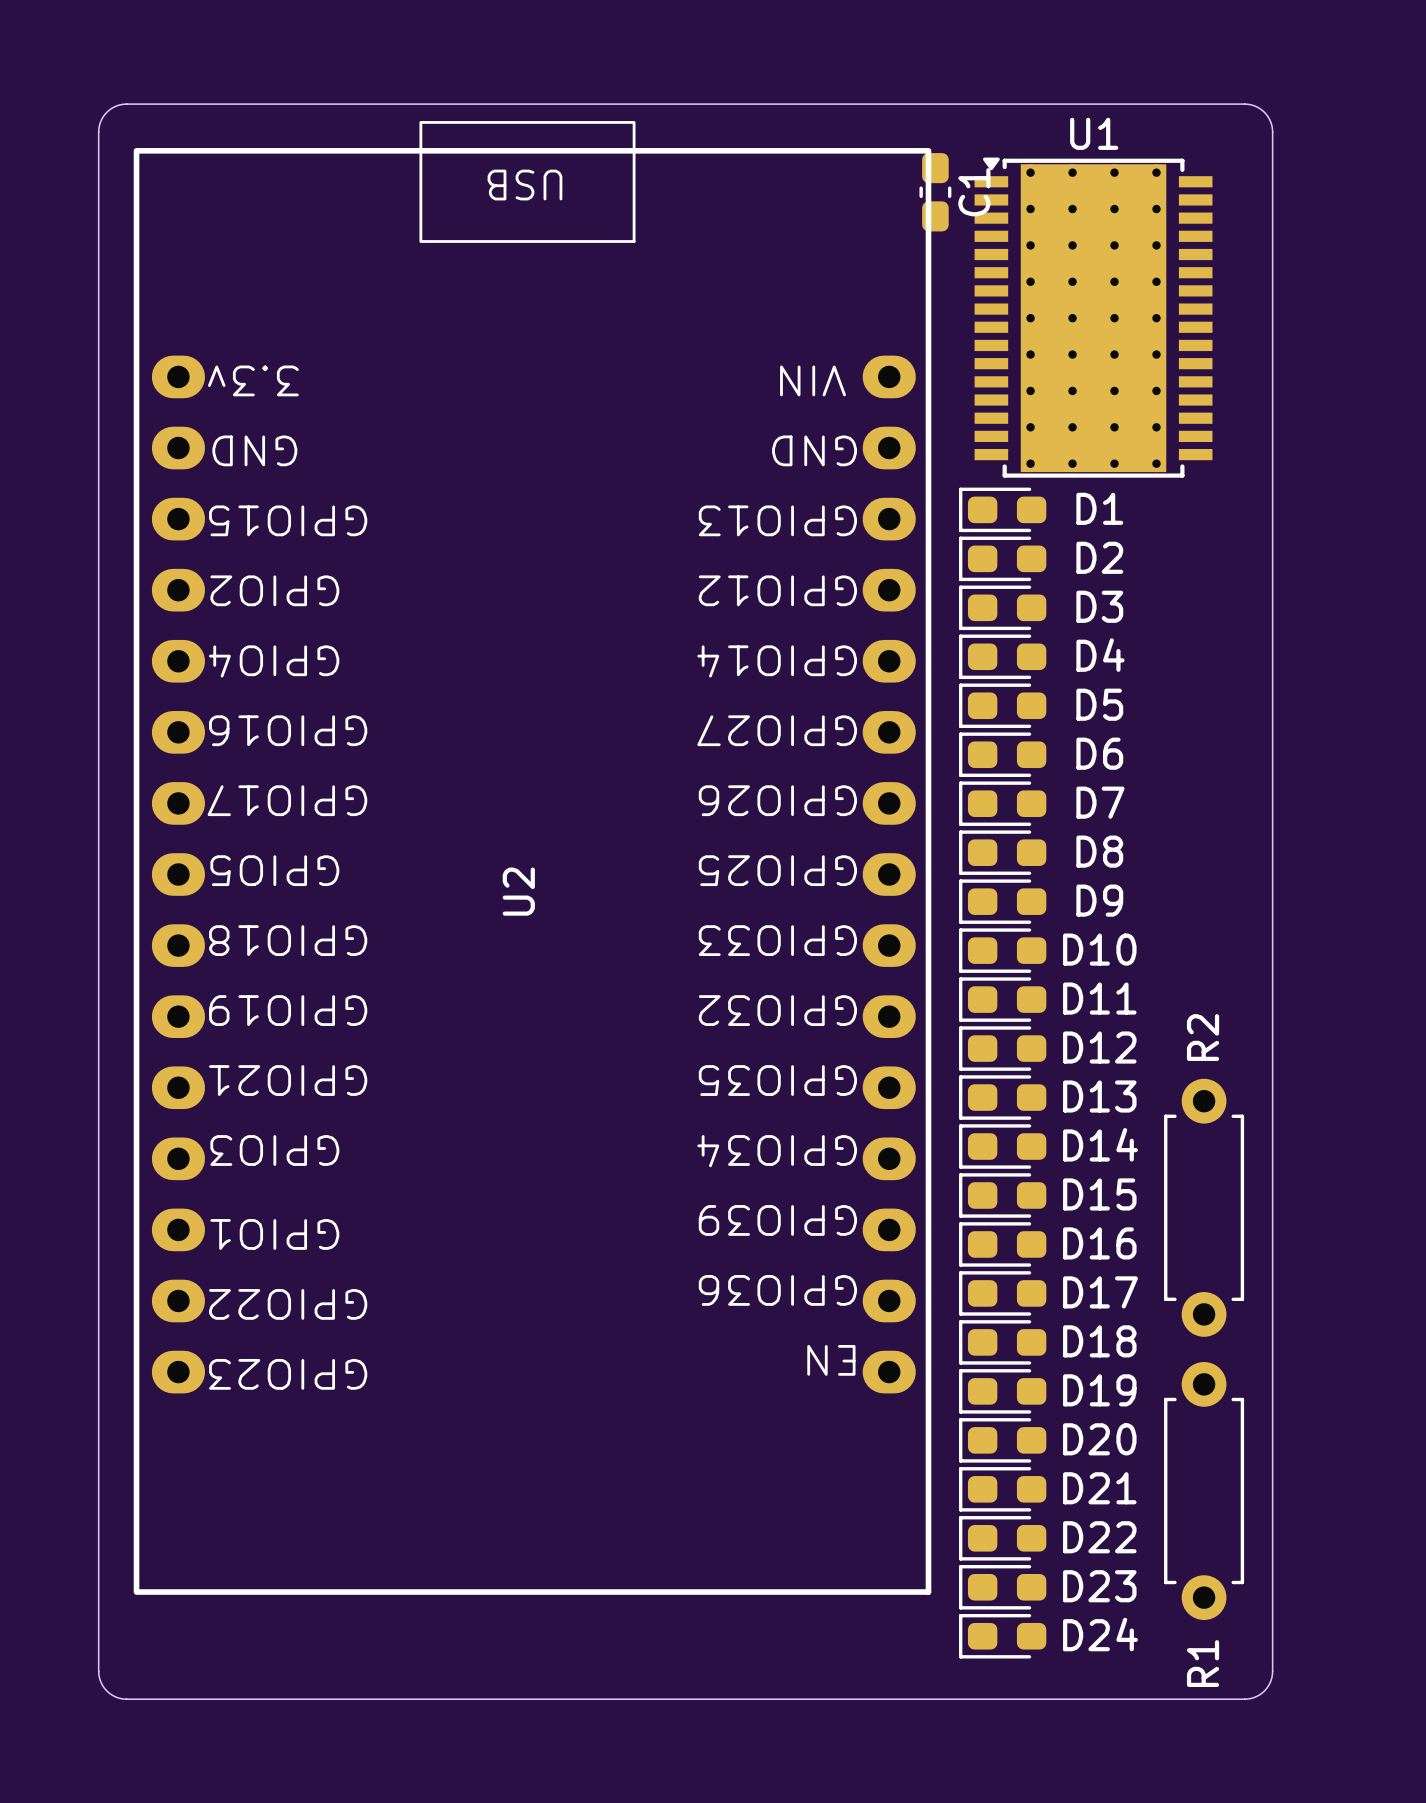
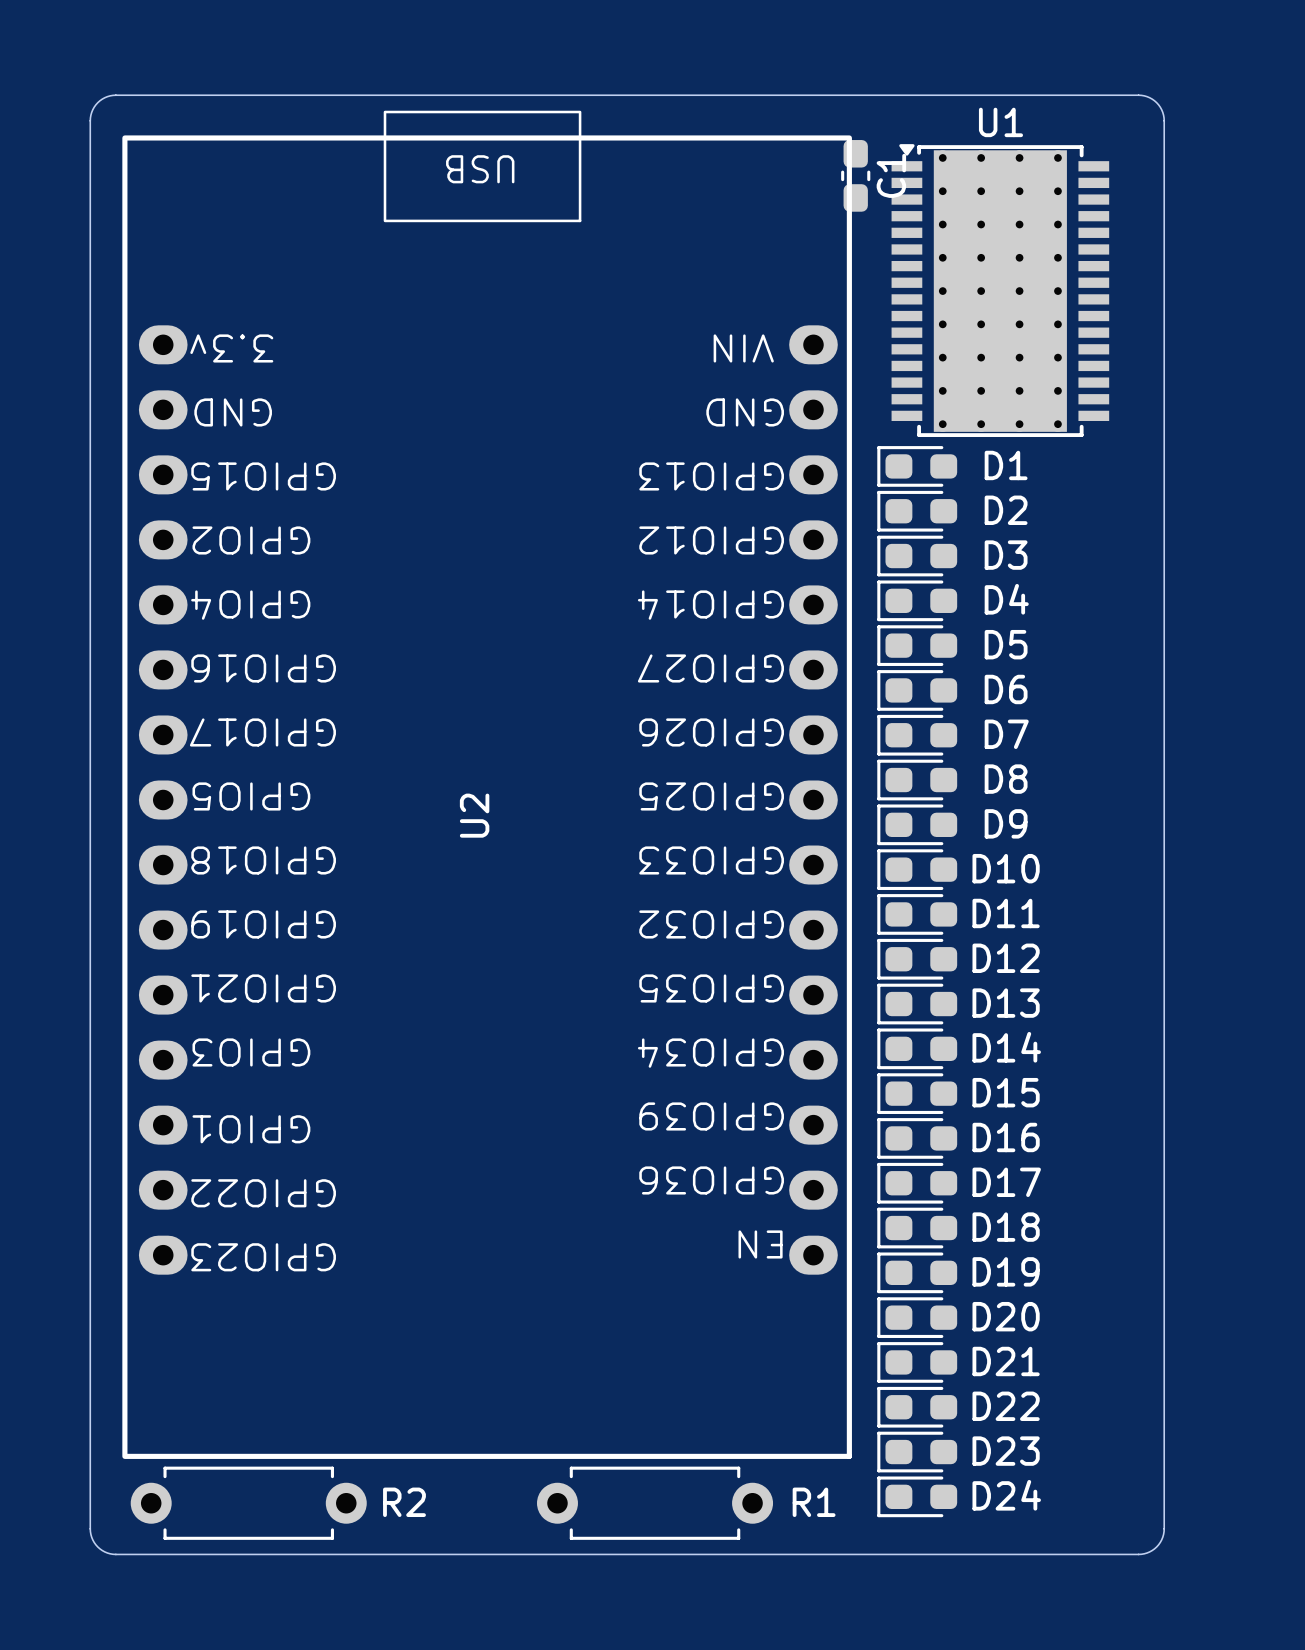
R2 rotation: 0° (1204, 1207) -> 90° clockwise (248, 1503)
R2 position: (1204, 1207) -> (248, 1503)
R1 rotation: 0° (1204, 1491) -> 90° clockwise (655, 1503)
R1 position: (1204, 1491) -> (655, 1503)
R1 name position: R1 (1203, 1663) -> R1 (814, 1502)

